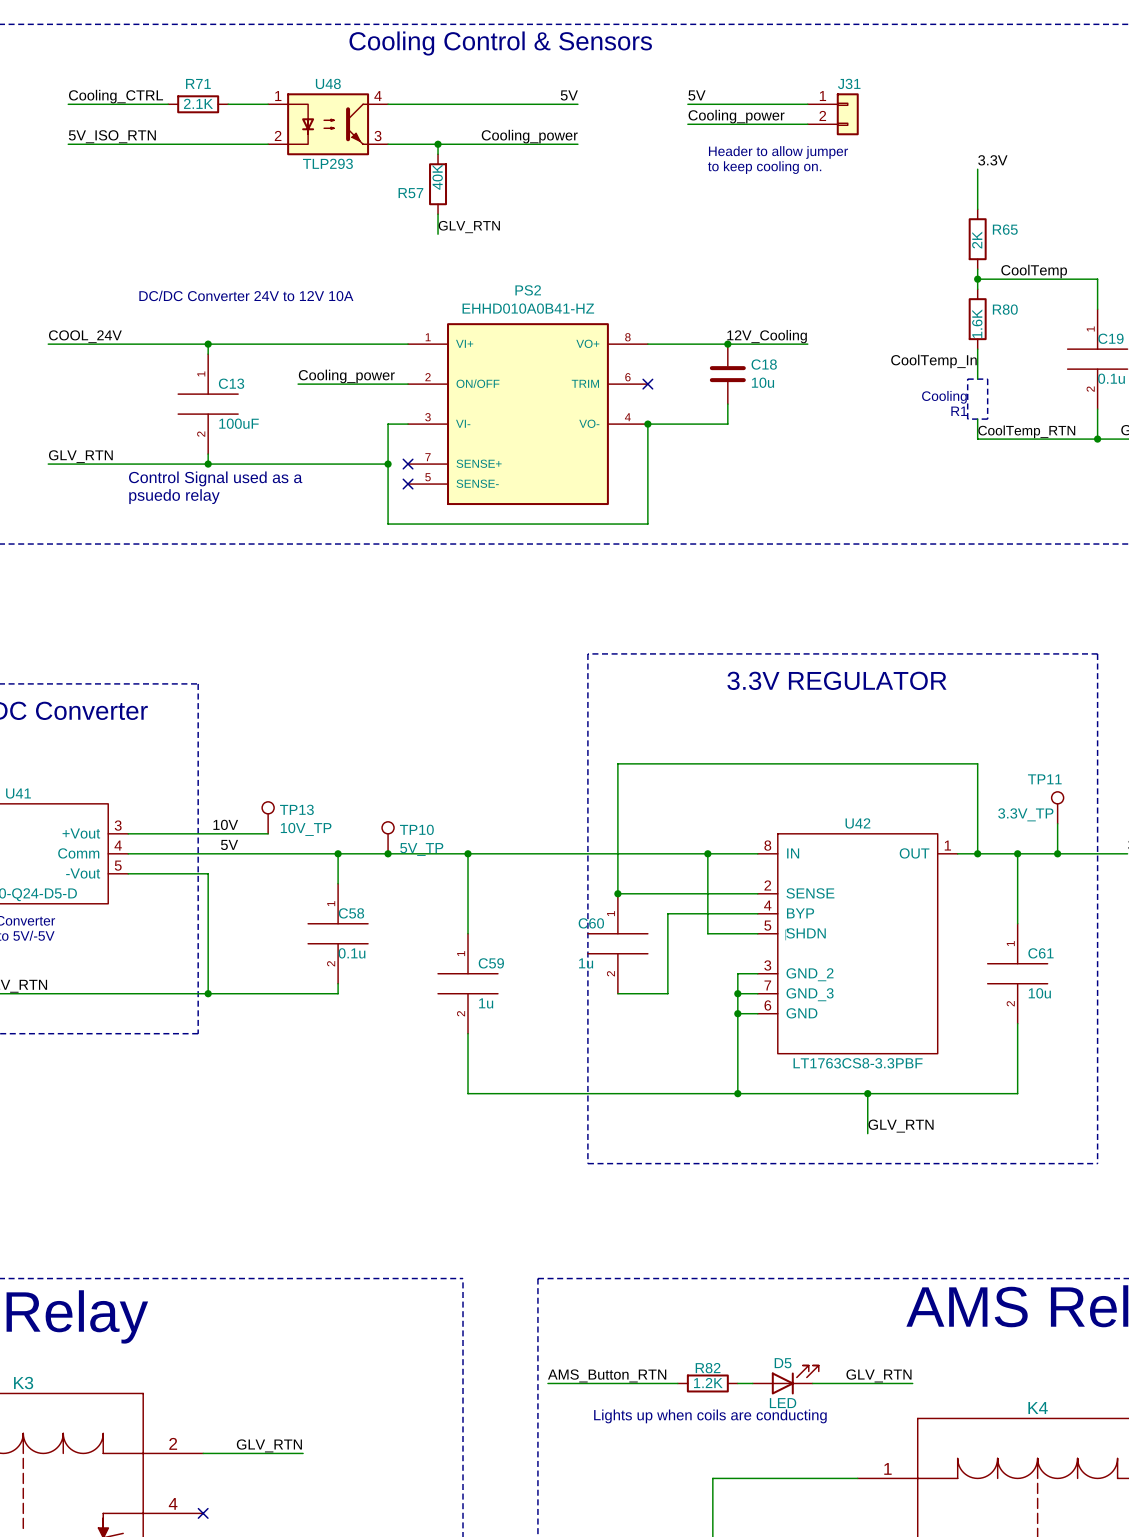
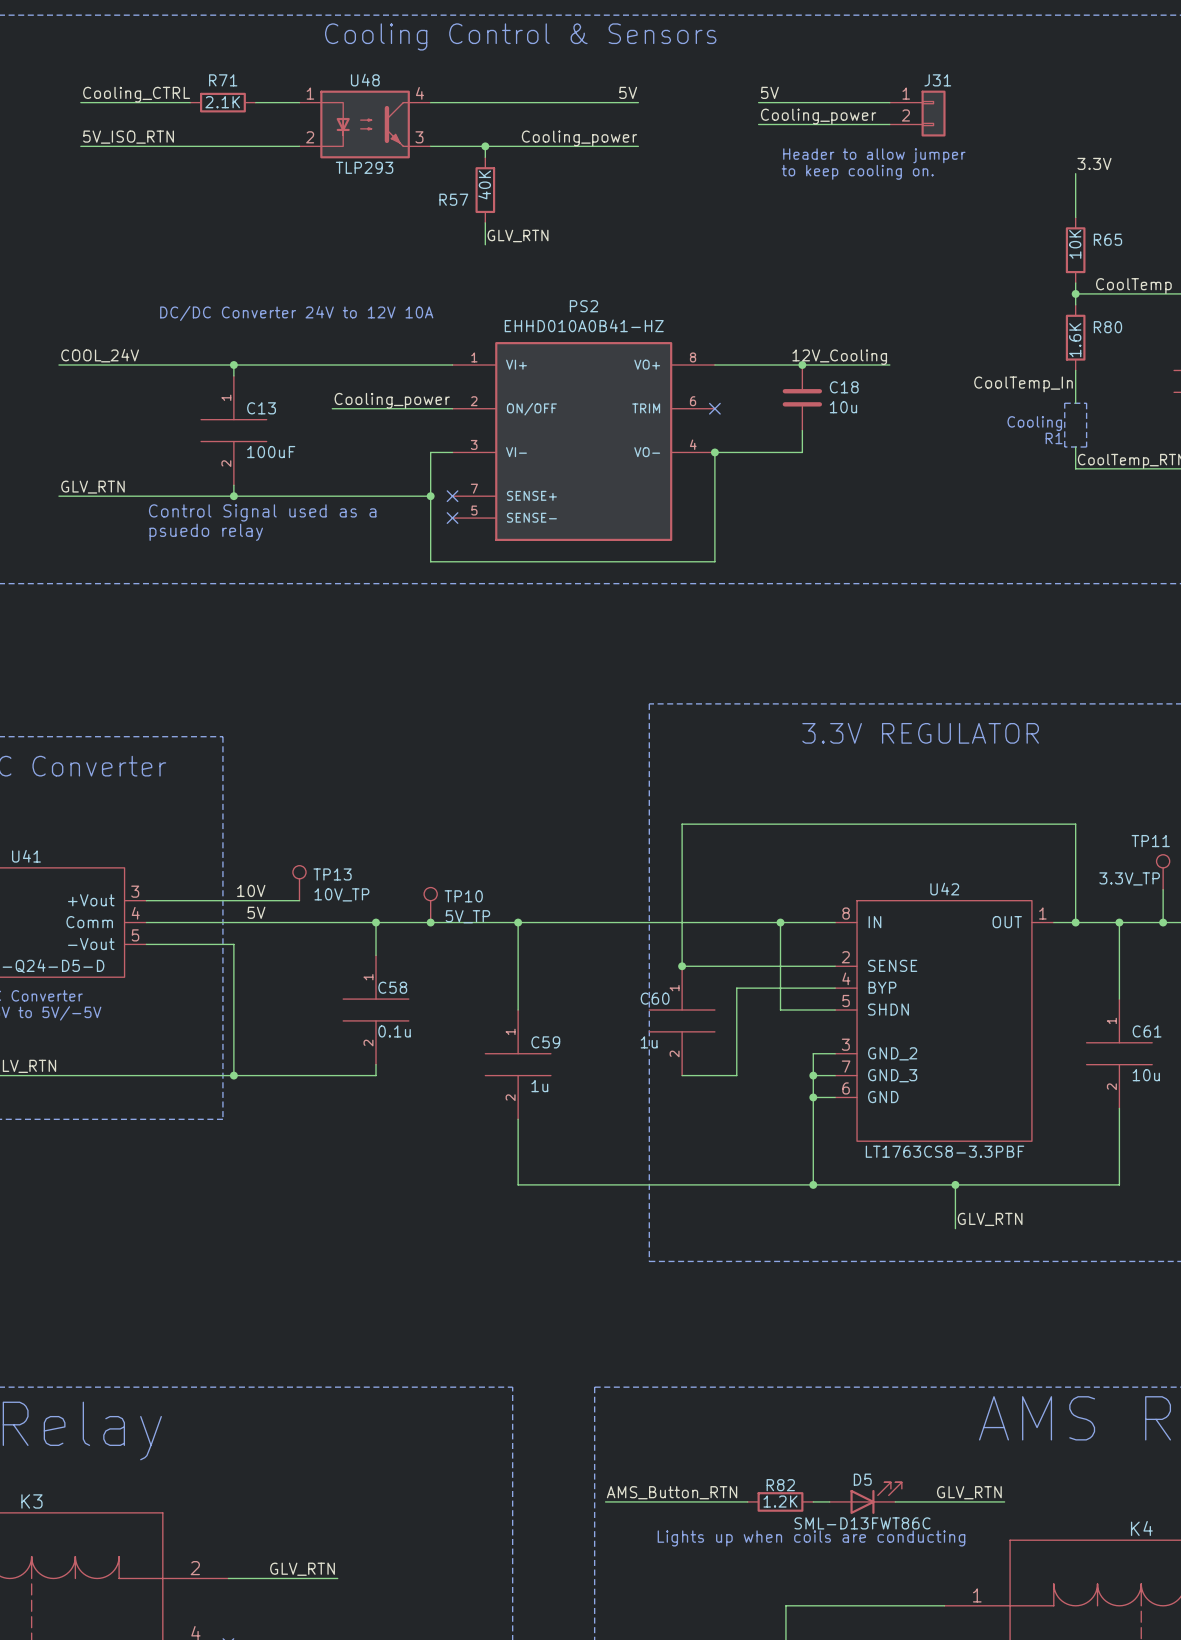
R65 value: 2K (977, 240) -> 10K (1075, 244)
D5 value: LED (783, 1403) -> SML-D13FWT86C (862, 1523)

